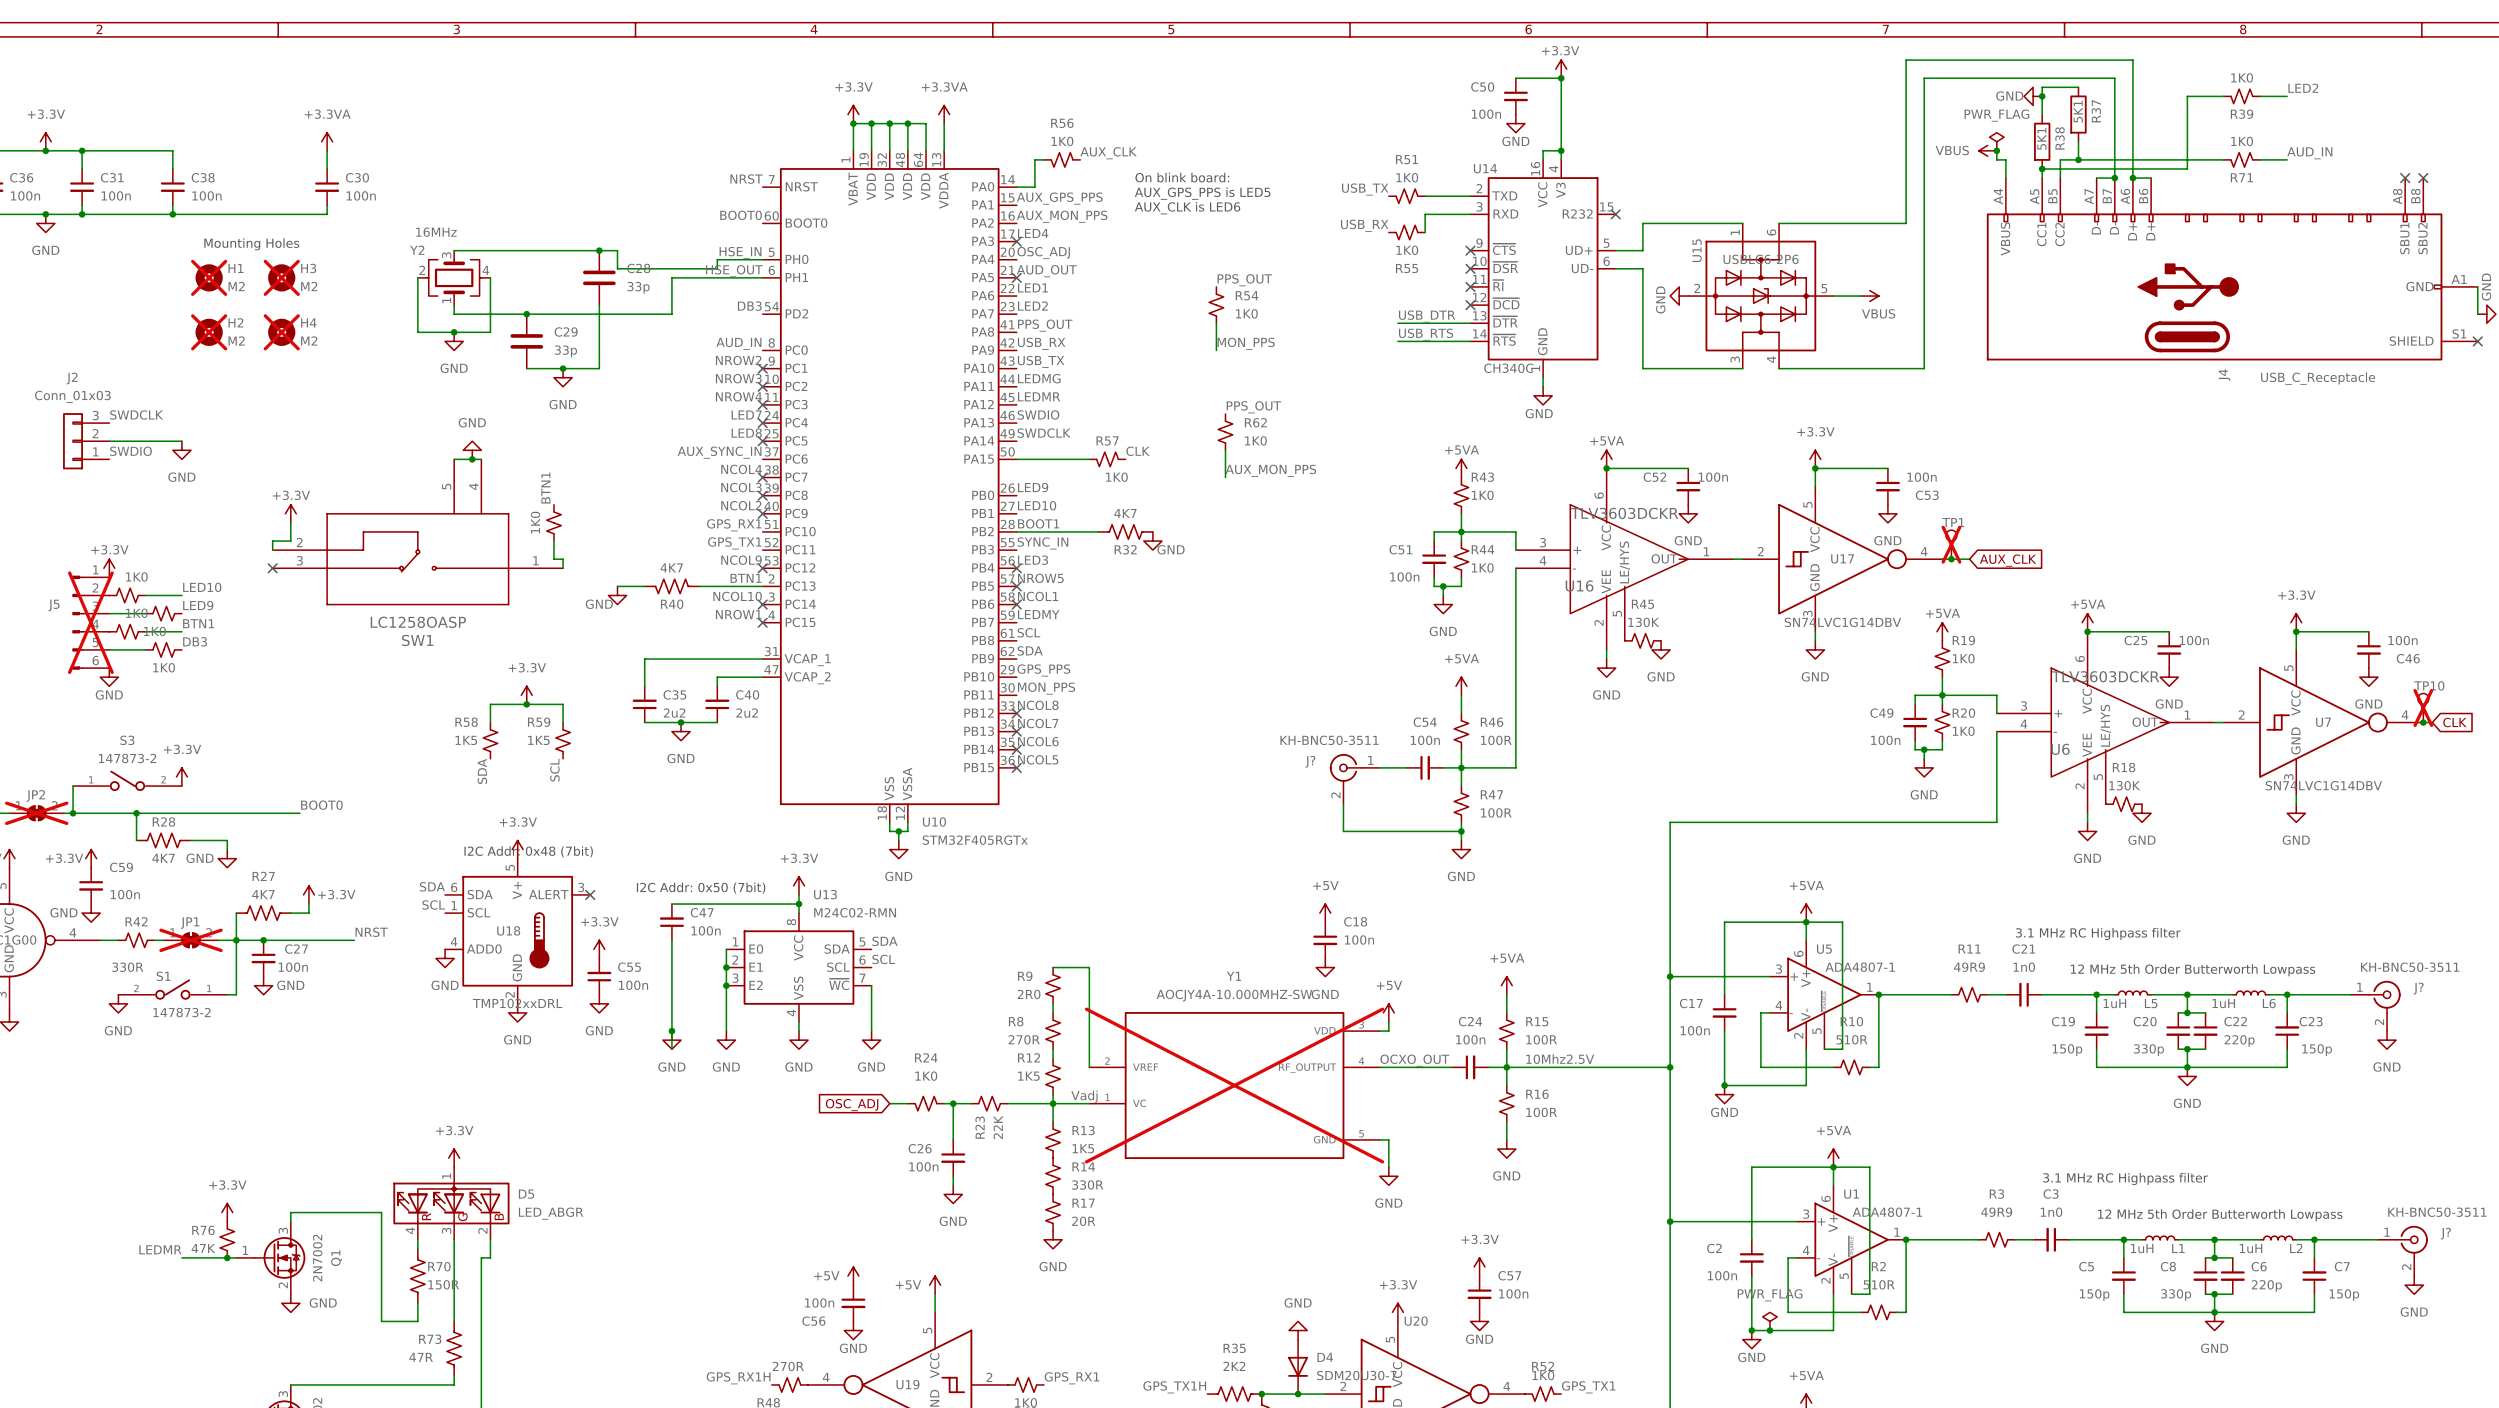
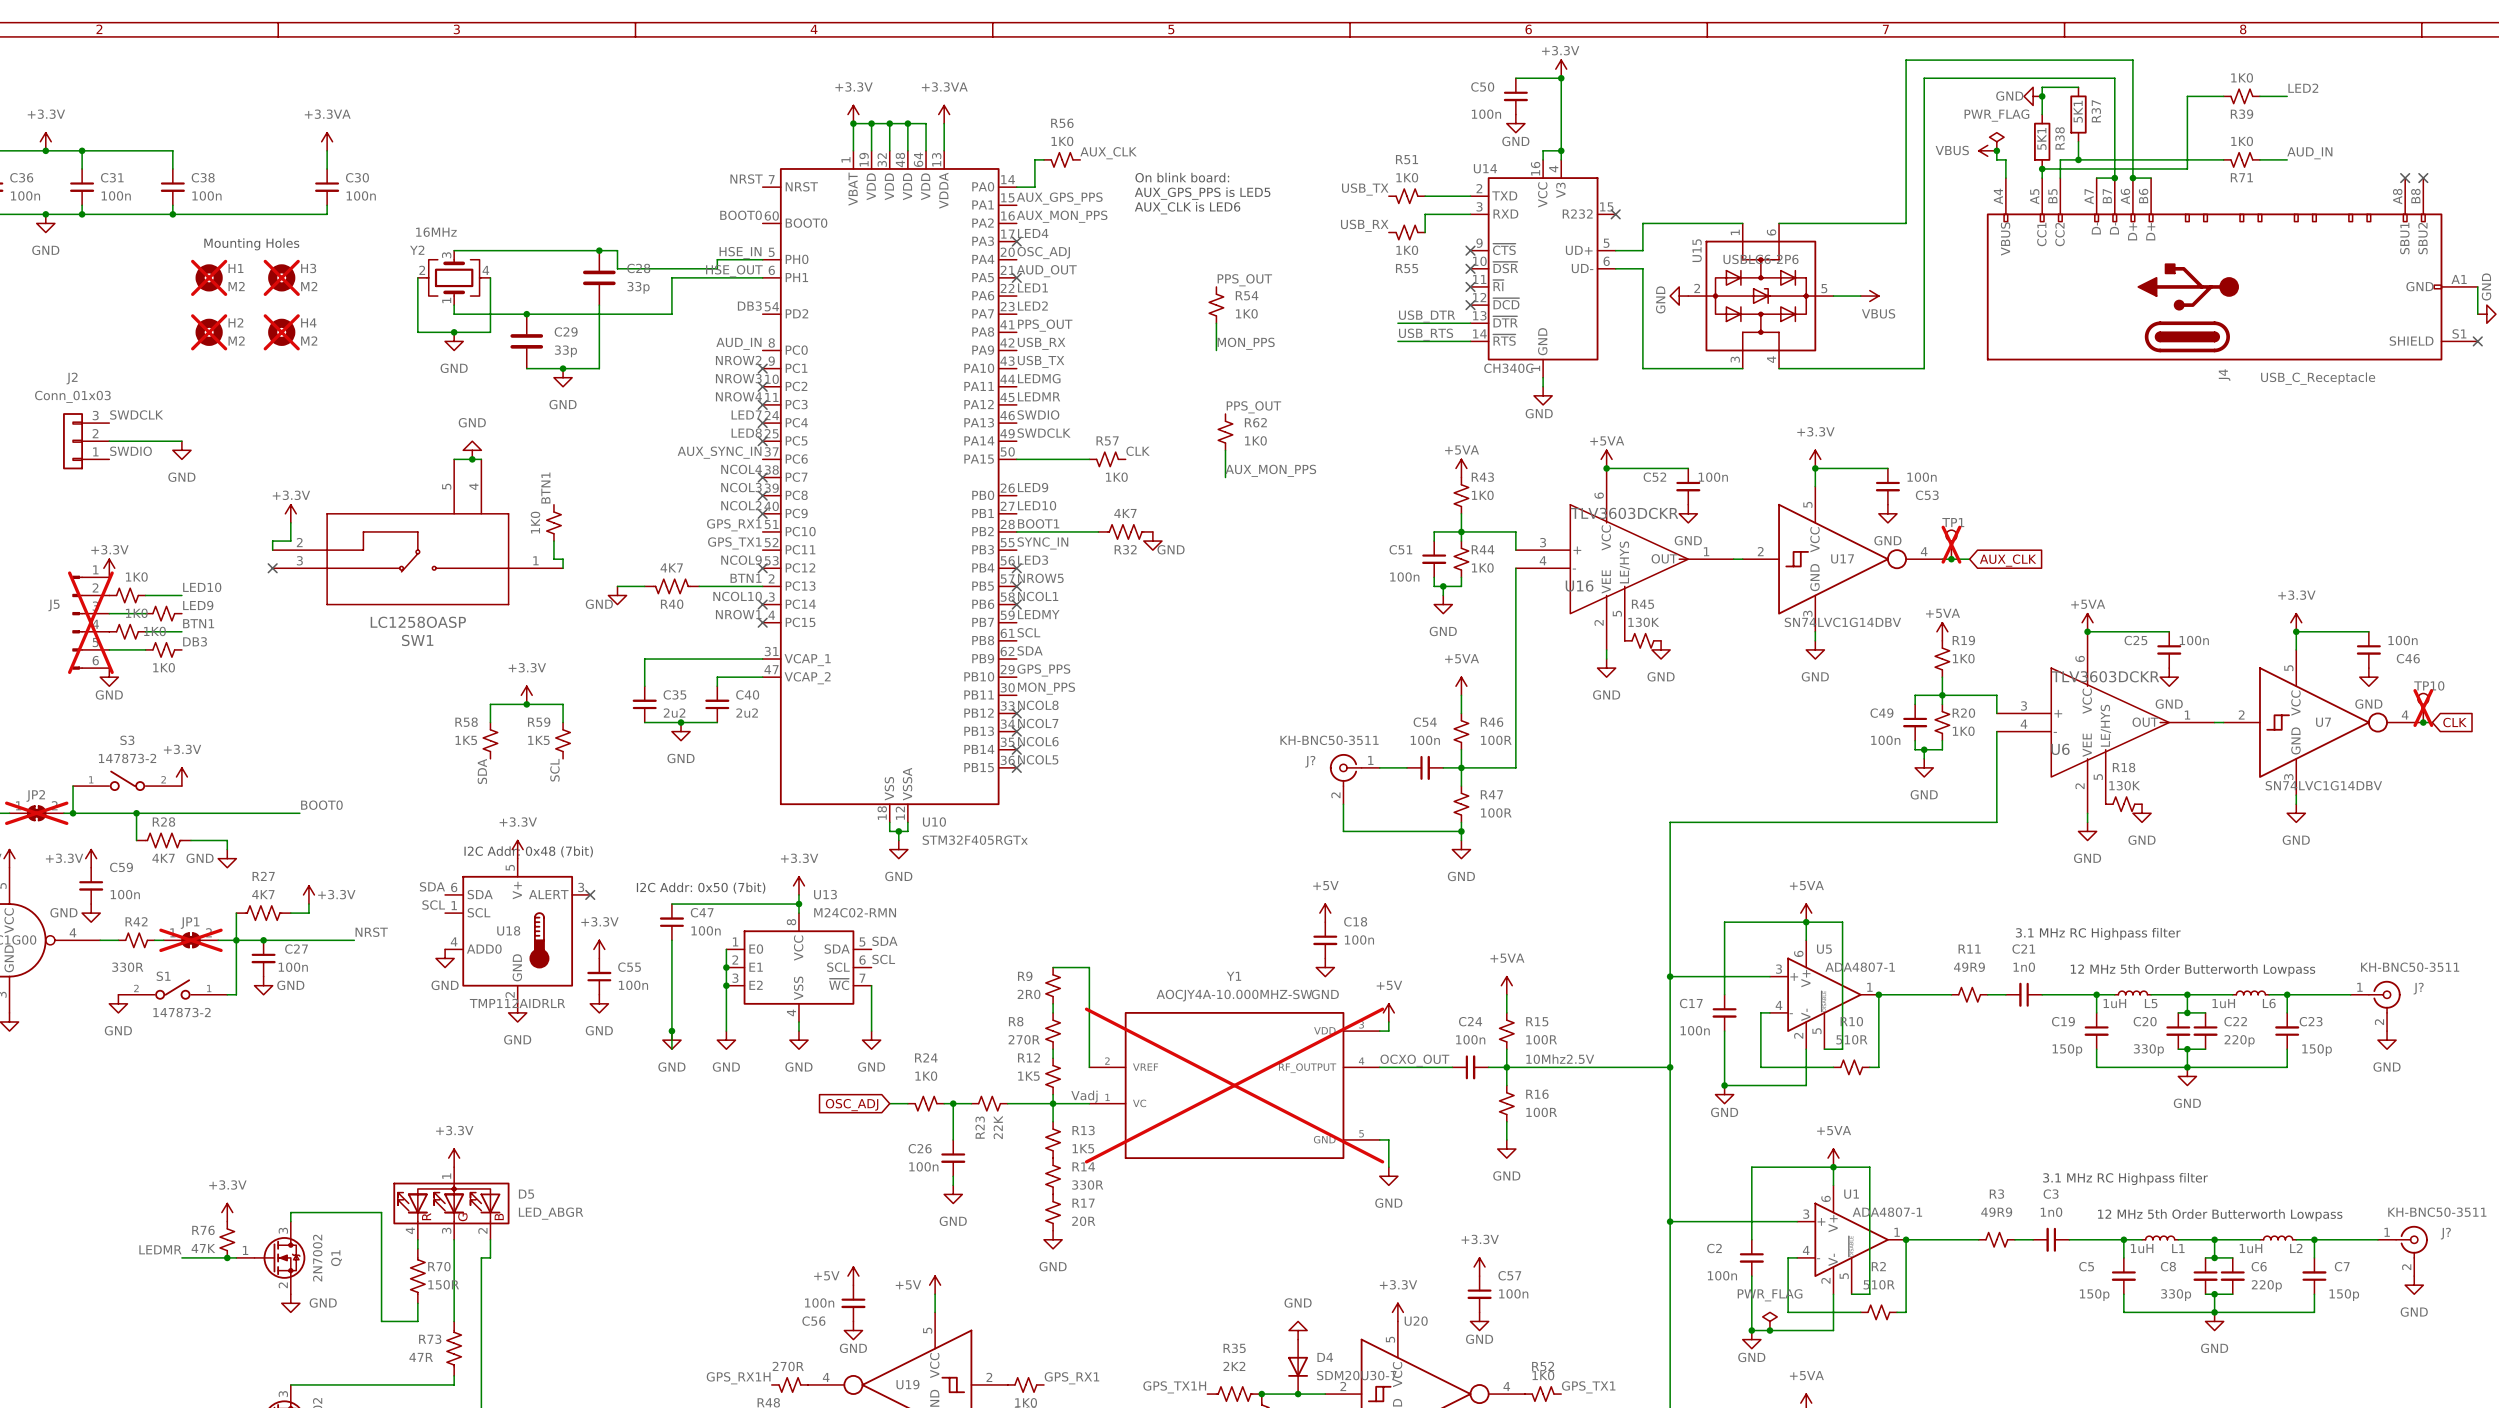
U18 value: TMP102xxDRL (517, 1003) -> TMP112AIDRLR (517, 1003)

